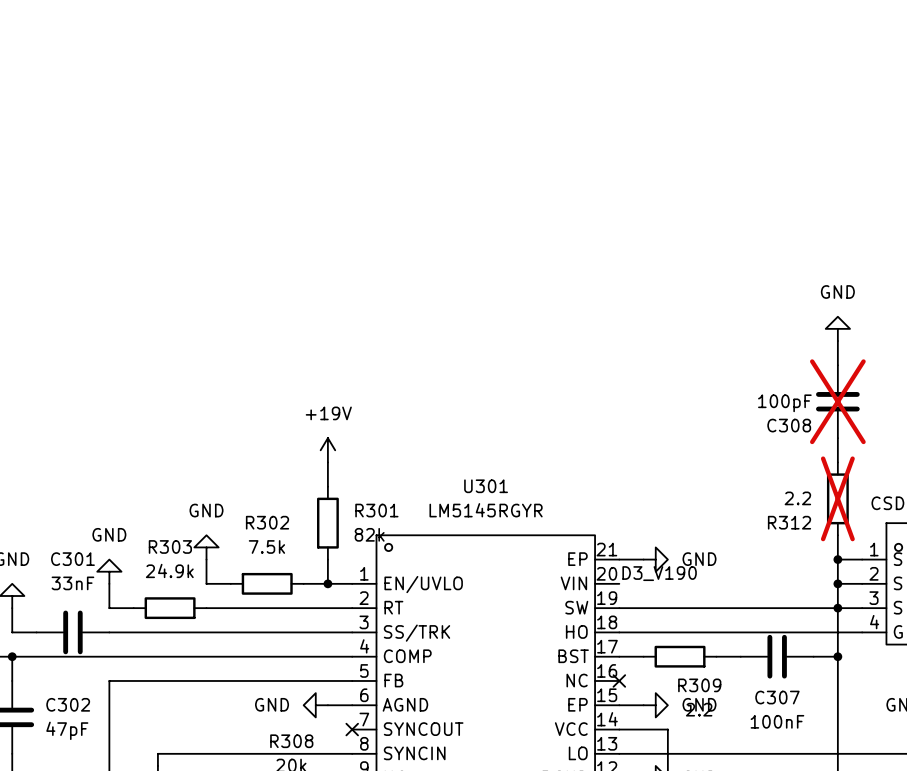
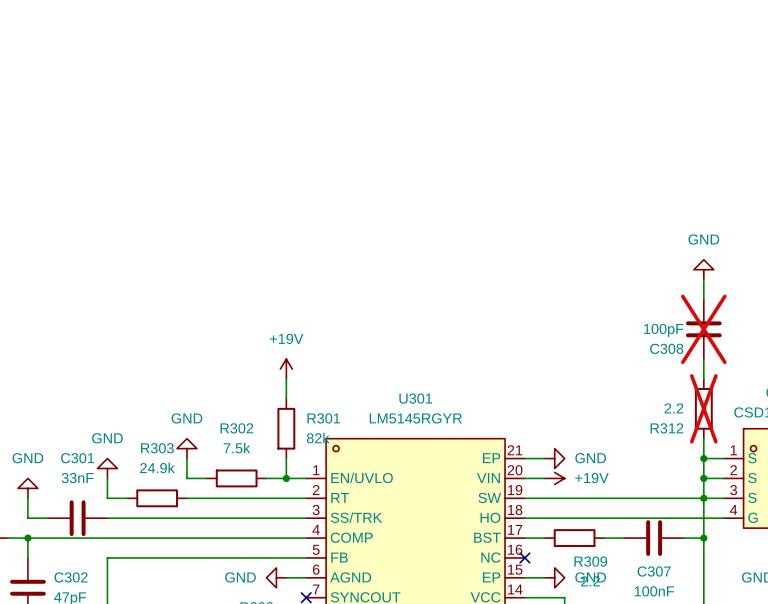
label: D3_V190 (659, 573) -> none
wire: none -> (524, 478) (544, 478)
power symbol: none -> +19V (554, 478)

